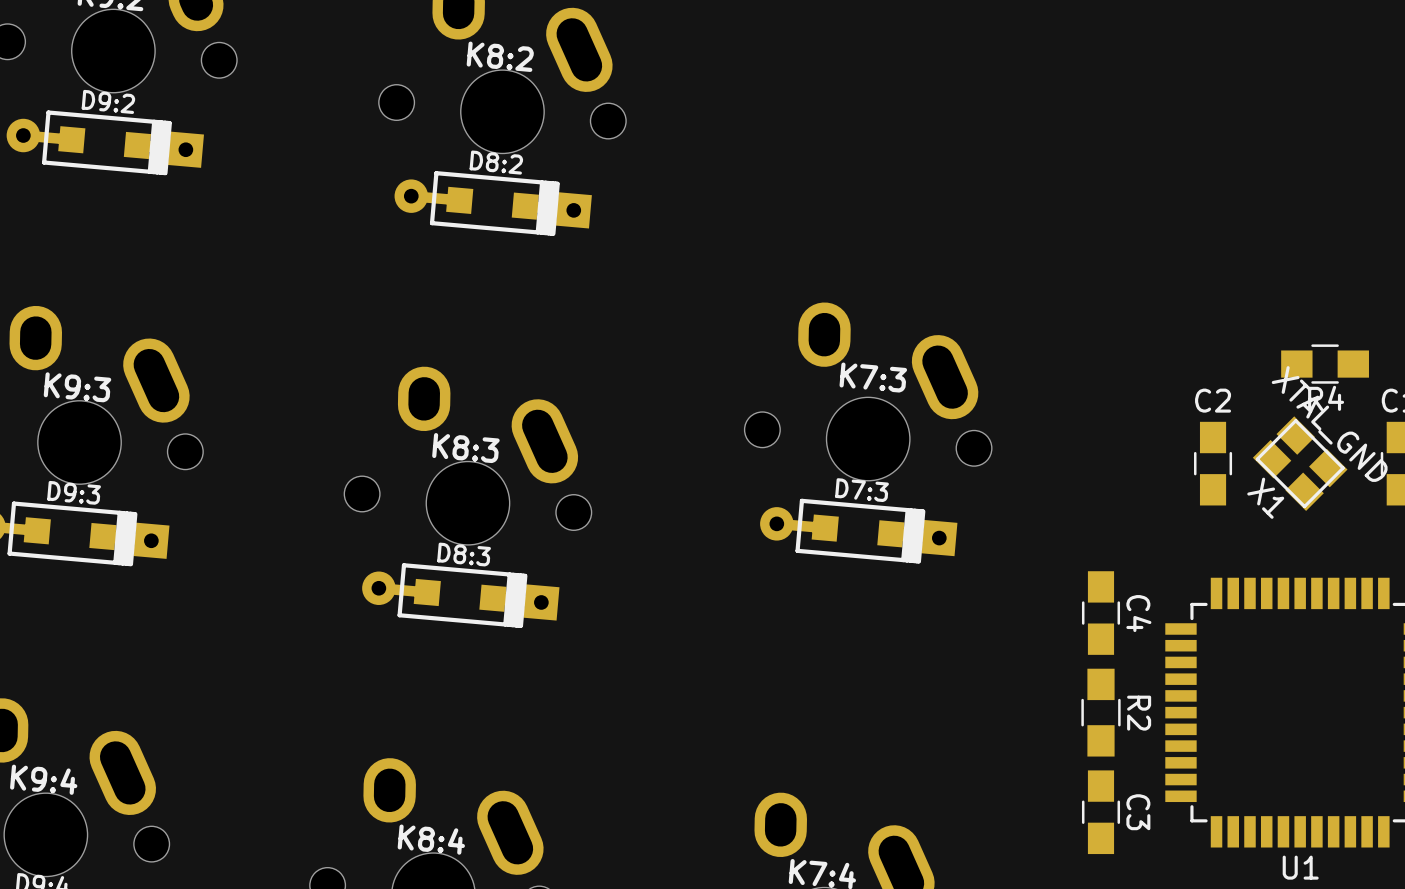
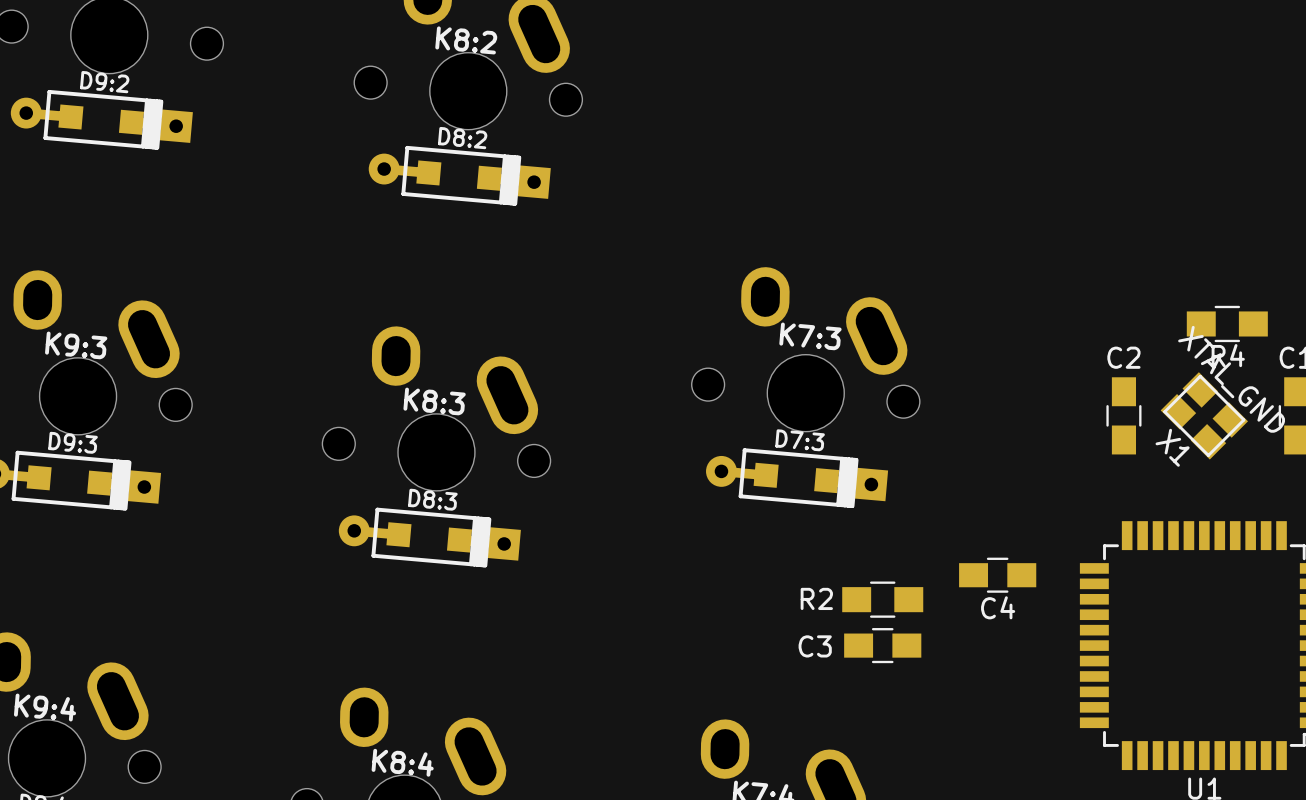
C4 rotation: 0° (1100, 613) -> 90° clockwise (997, 575)
R2 rotation: 0° (1100, 712) -> 90° clockwise (882, 599)
R2 position: (1100, 712) -> (882, 599)
R2 name position: R2 (1139, 713) -> R2 (816, 598)
C3 rotation: 0° (1100, 812) -> 90° clockwise (882, 645)
C3 position: (1100, 812) -> (882, 645)
C3 name position: C3 (1138, 812) -> C3 (815, 646)

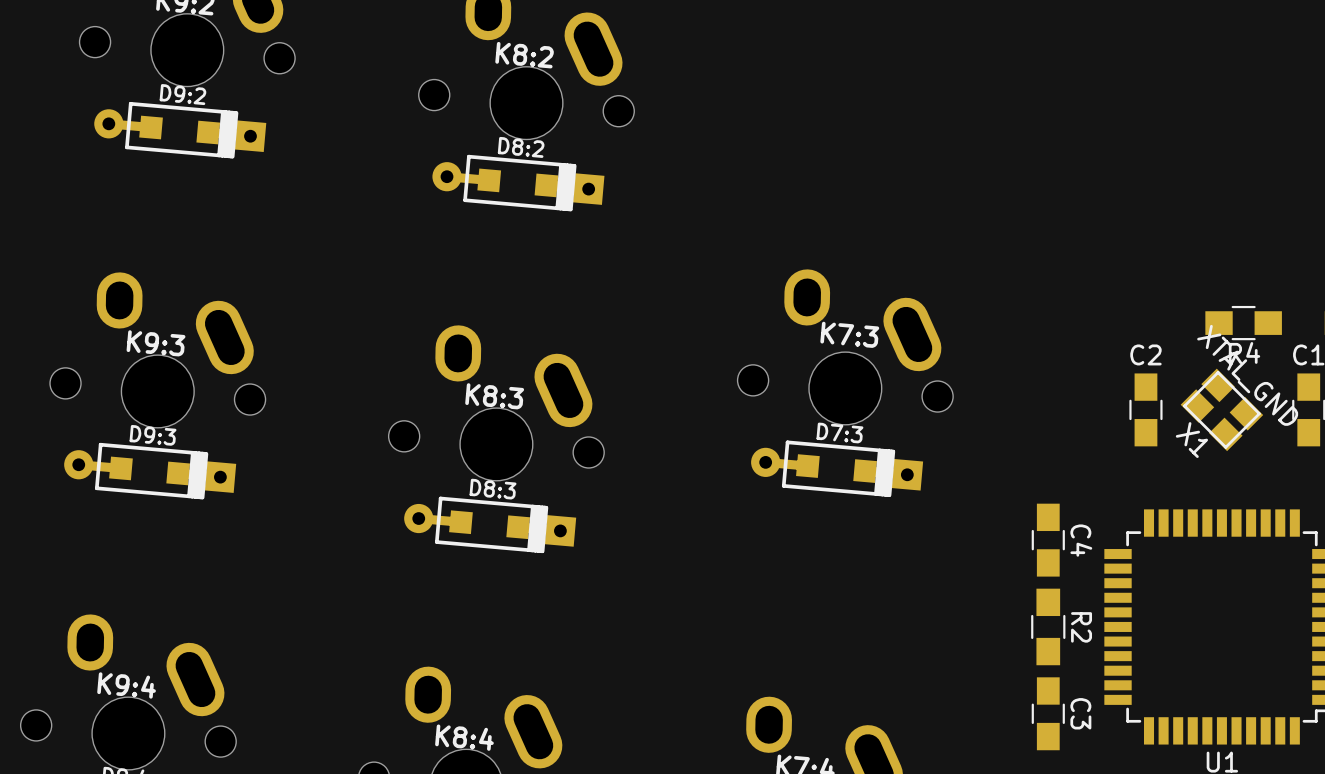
C4 rotation: 0° (997, 575) -> 90° clockwise (1048, 540)
R2 name position: R2 (816, 598) -> R2 (1081, 627)
R2 rotation: 0° (882, 599) -> 90° clockwise (1048, 626)
R2 position: (882, 599) -> (1048, 626)
C4 name position: C4 (998, 607) -> C4 (1081, 540)
C3 rotation: 0° (882, 645) -> 90° clockwise (1048, 713)
C3 position: (882, 645) -> (1048, 713)
C3 name position: C3 (815, 646) -> C3 (1080, 713)

